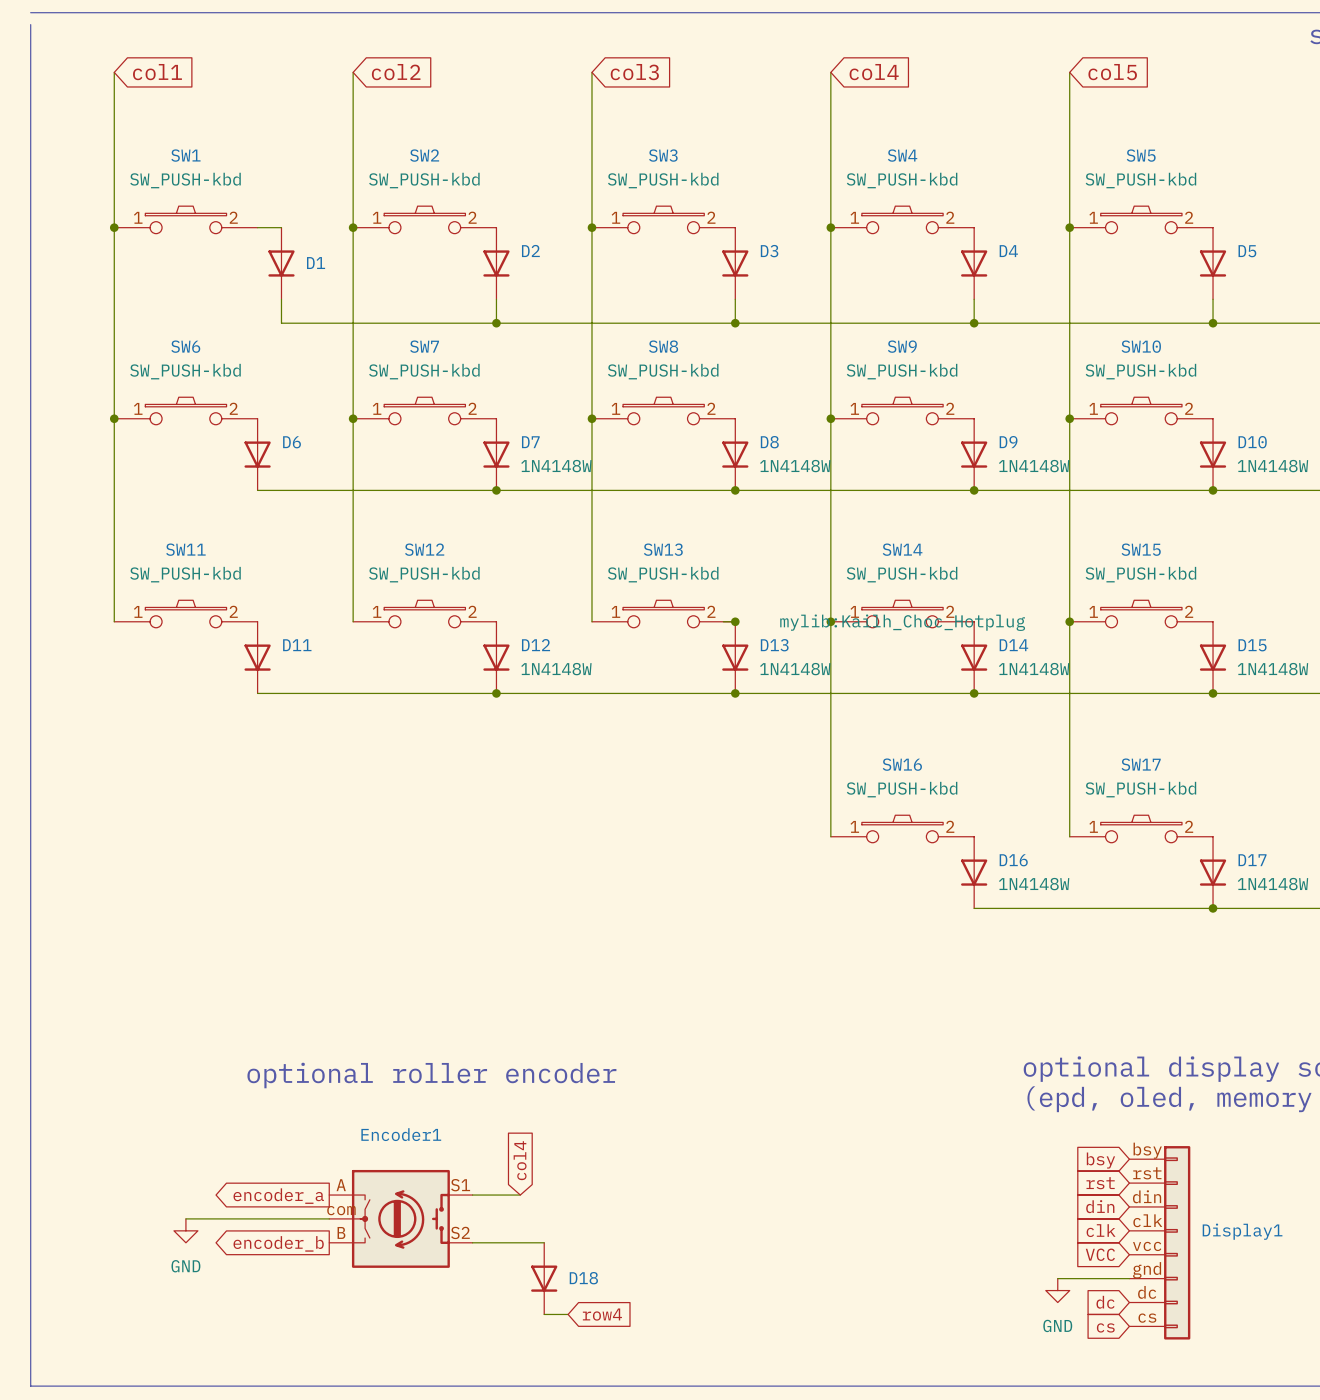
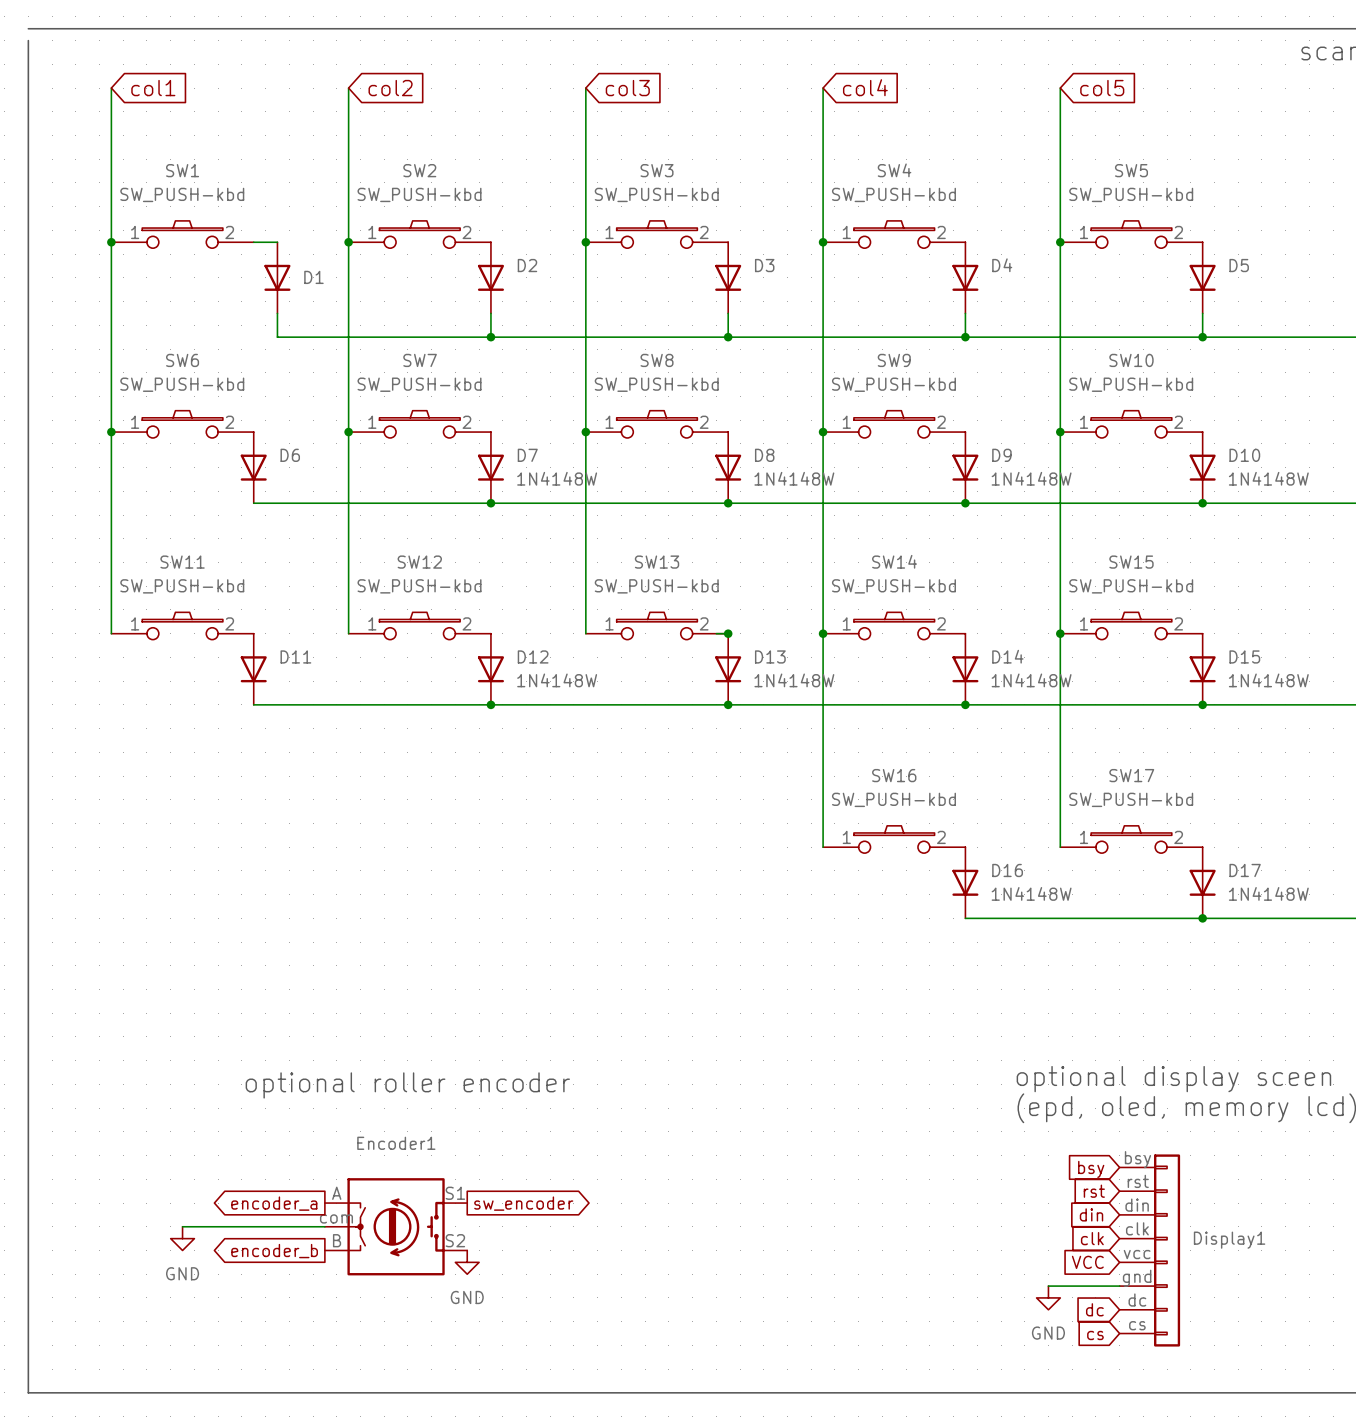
SW14 text: mylib:Kailh_Choc_Hotplug (902, 622) -> none
global label: col4 (520, 1160) -> none
wire: (472, 1195) (520, 1195) -> none
global label: none -> sw_encoder (523, 1203)
wire: (472, 1242) (544, 1242) -> none
power symbol: none -> GND (467, 1262)
D18: (544, 1278) -> none
wire: (544, 1314) (568, 1314) -> none
global label: row4 (602, 1314) -> none

